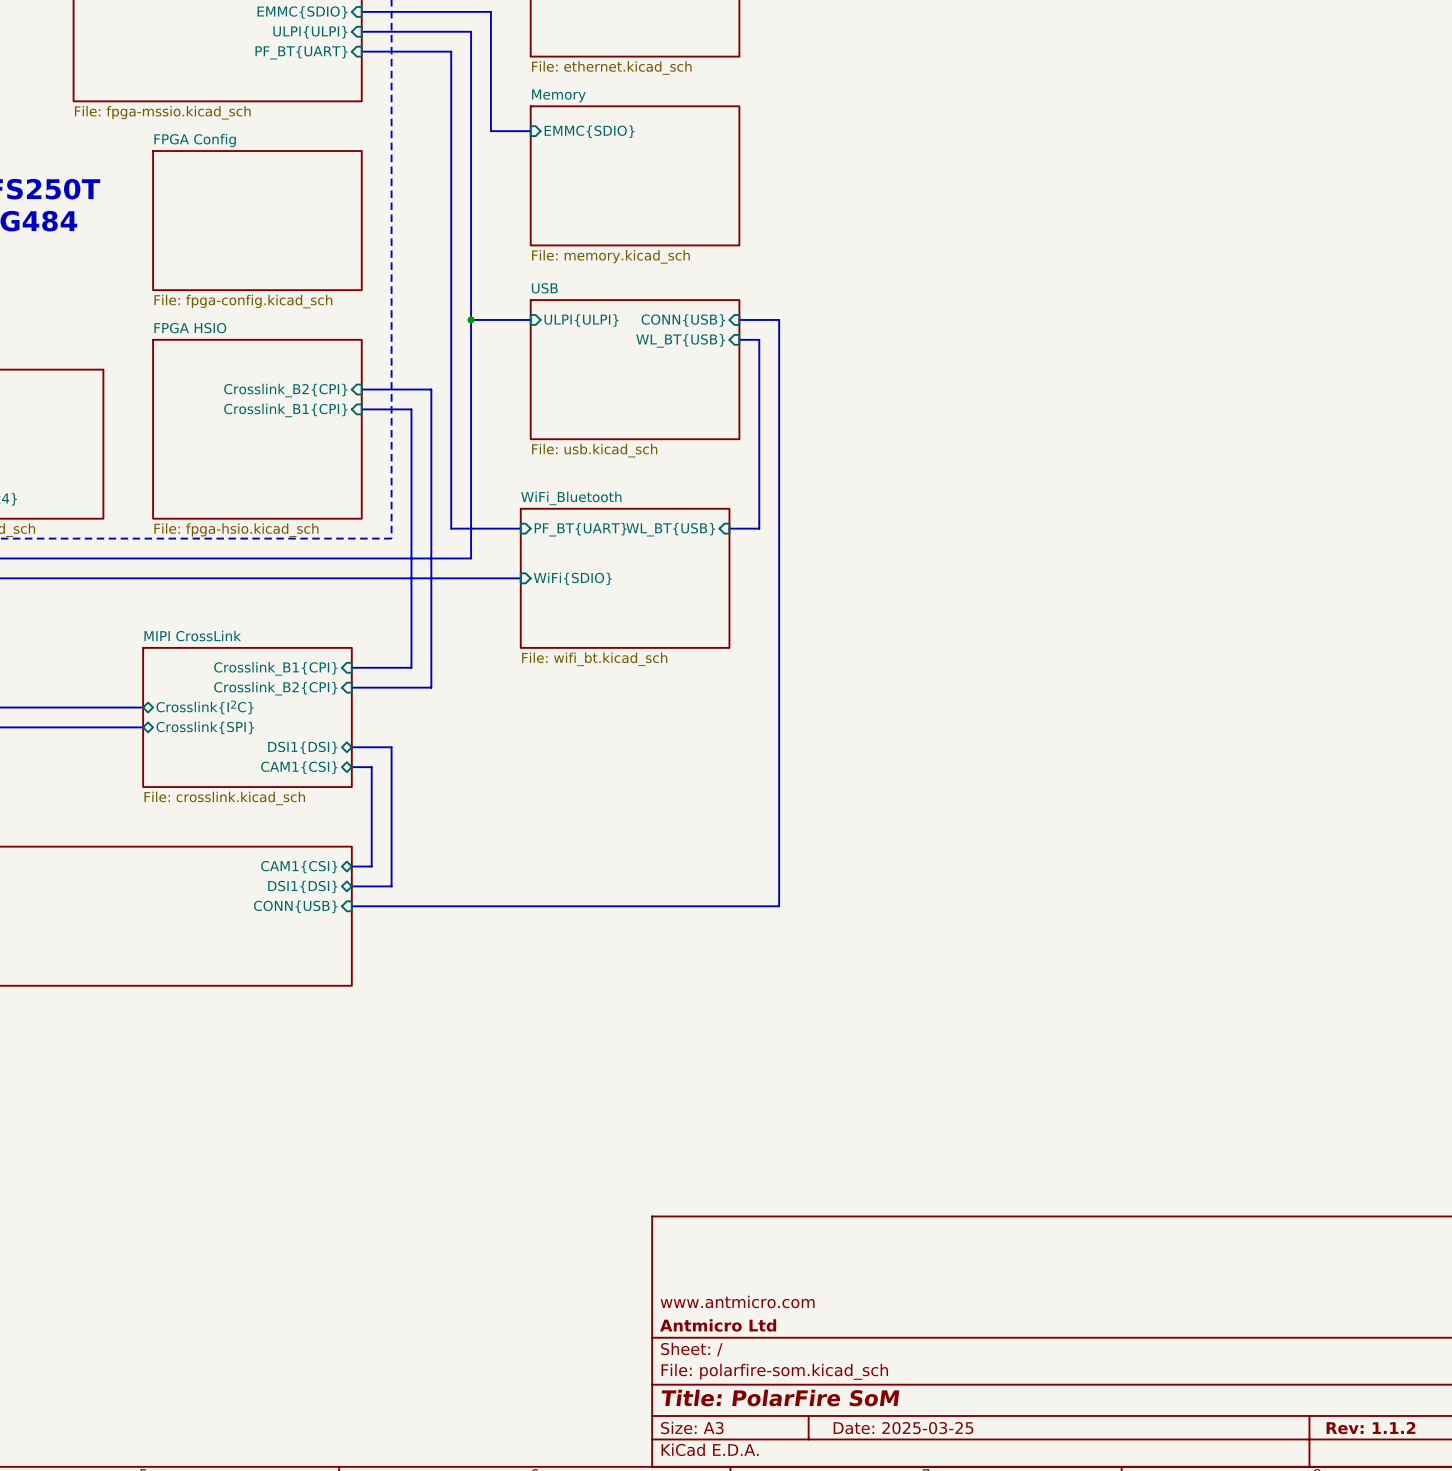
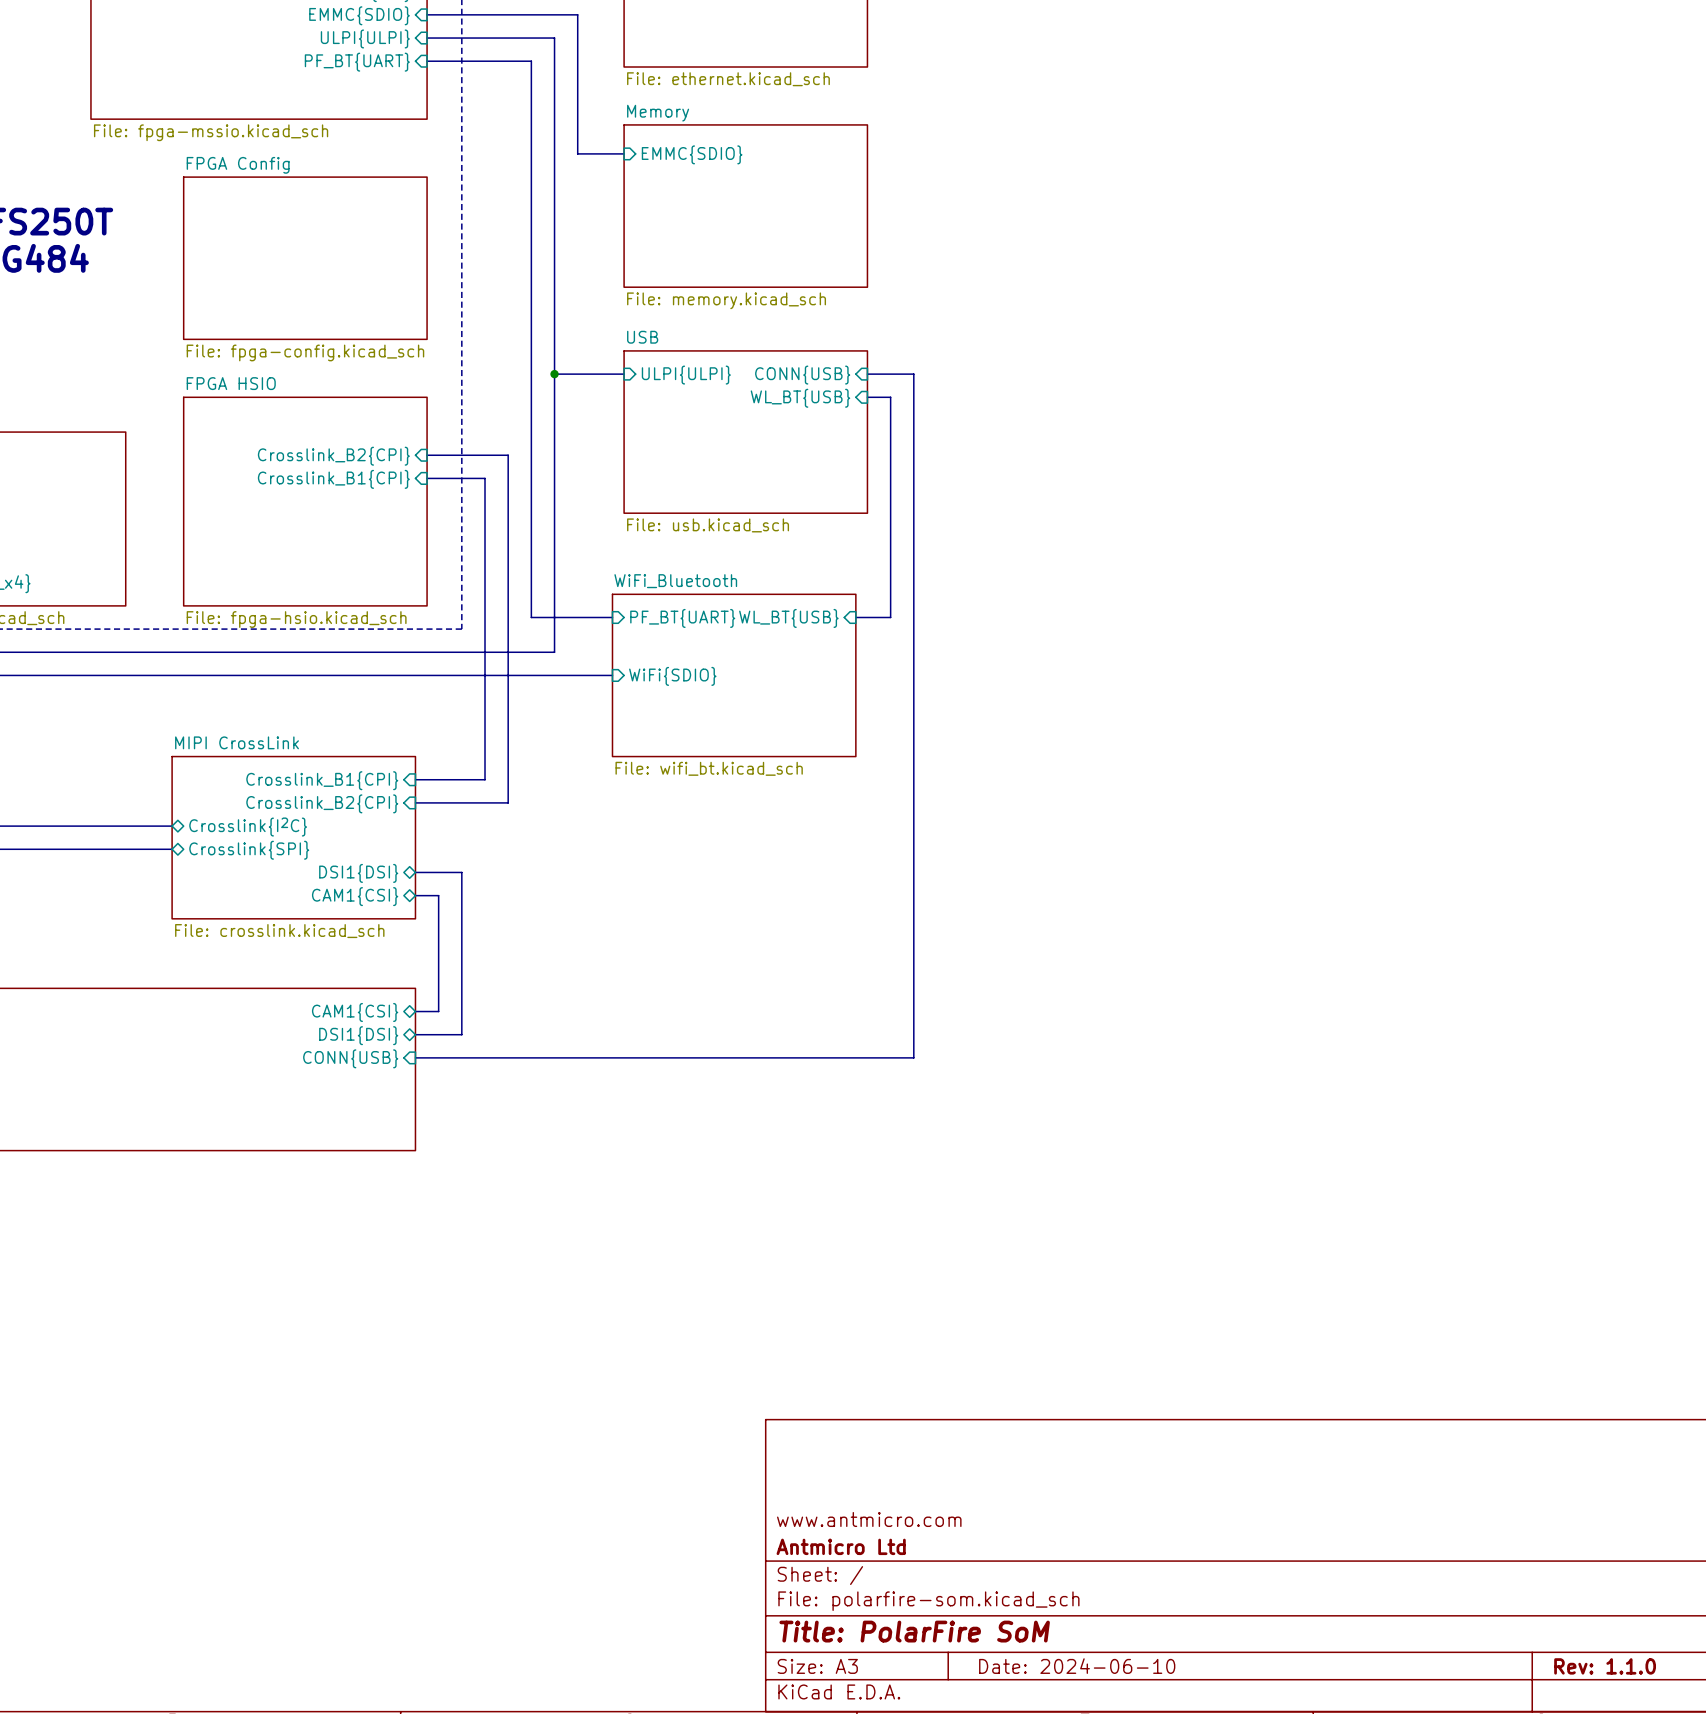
title block: Date: 2025-03-25 (903, 1428) -> Date: 2024-06-10 (1077, 1666)
title block: Rev: 1.1.2 (1370, 1428) -> Rev: 1.1.0 (1605, 1666)

